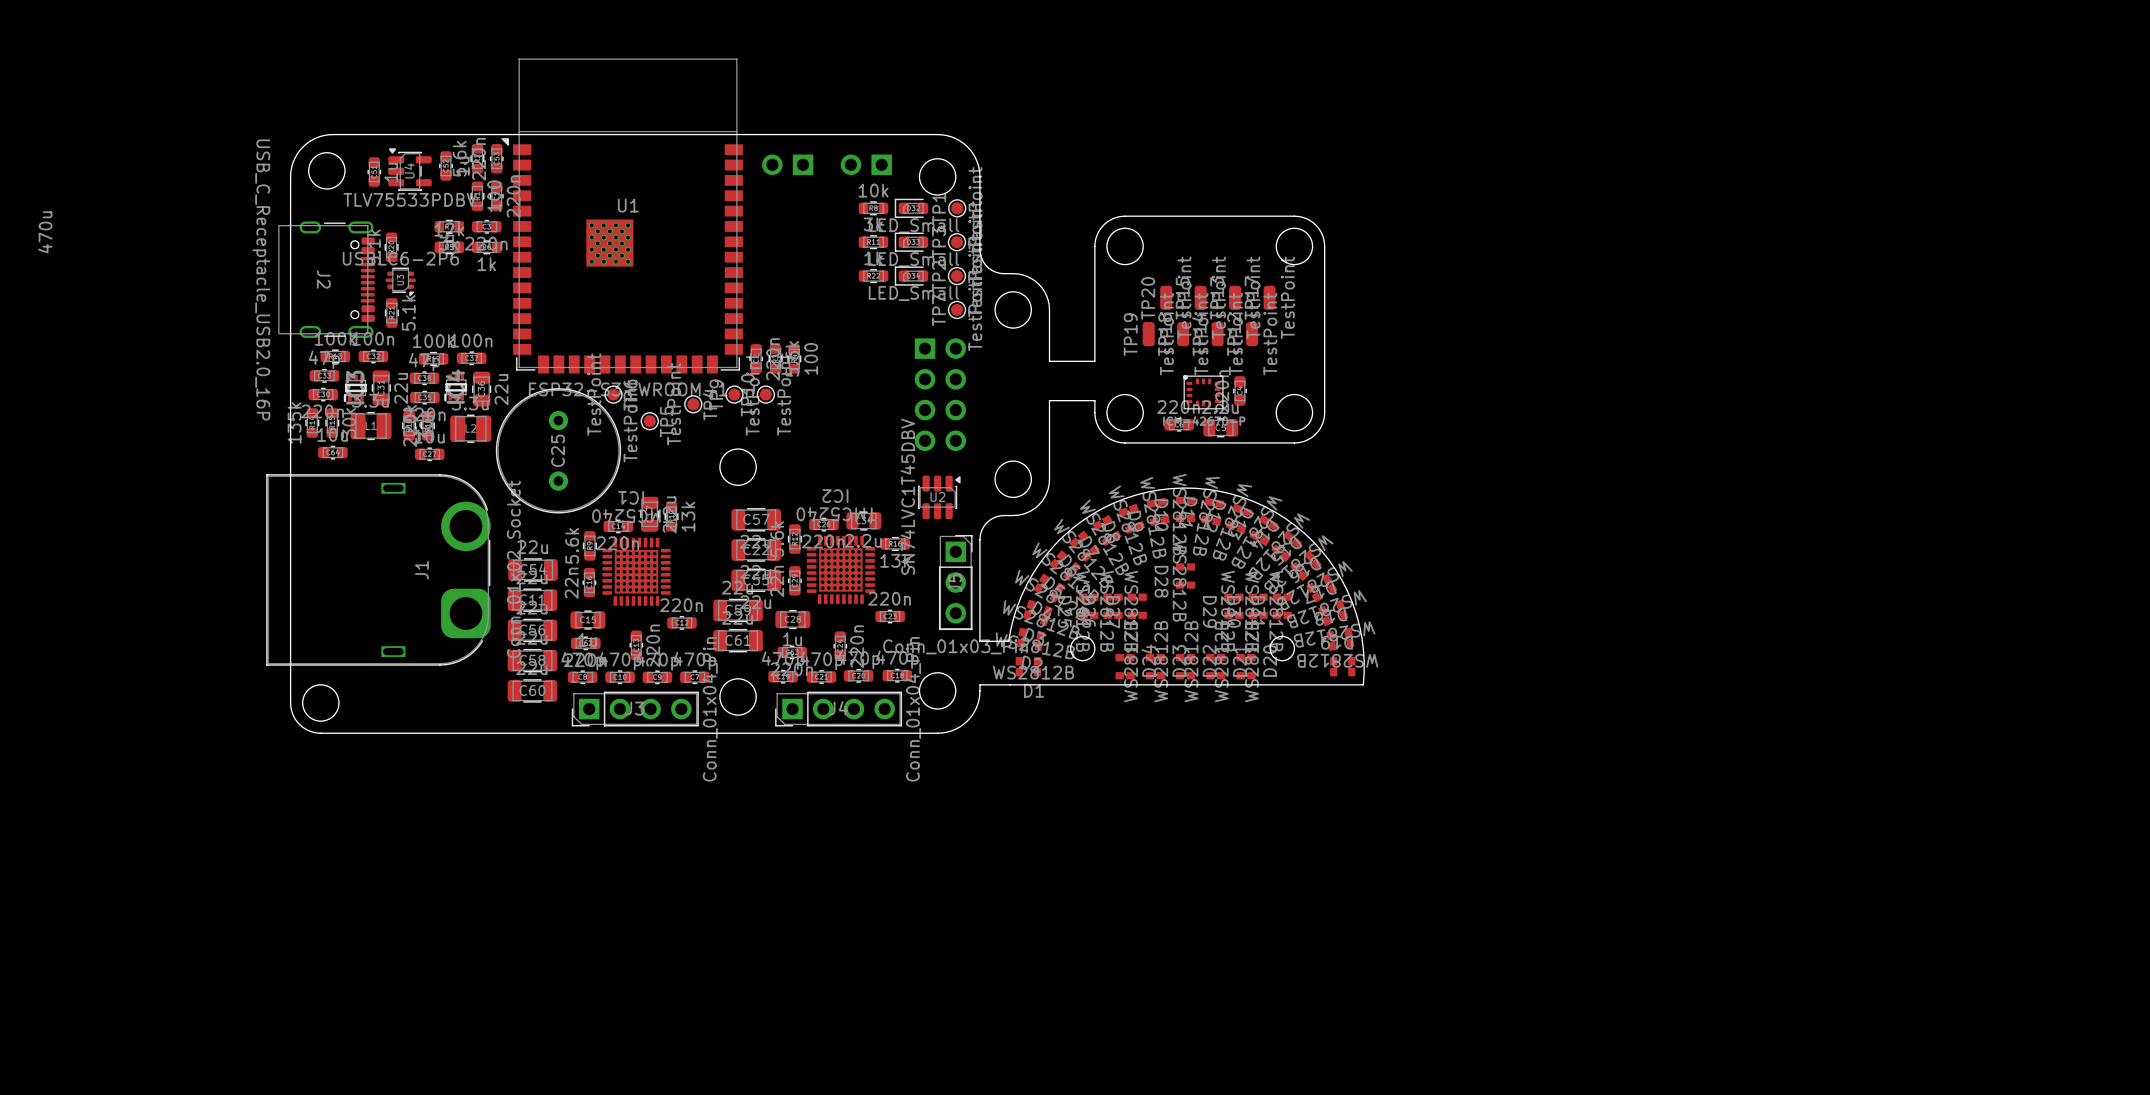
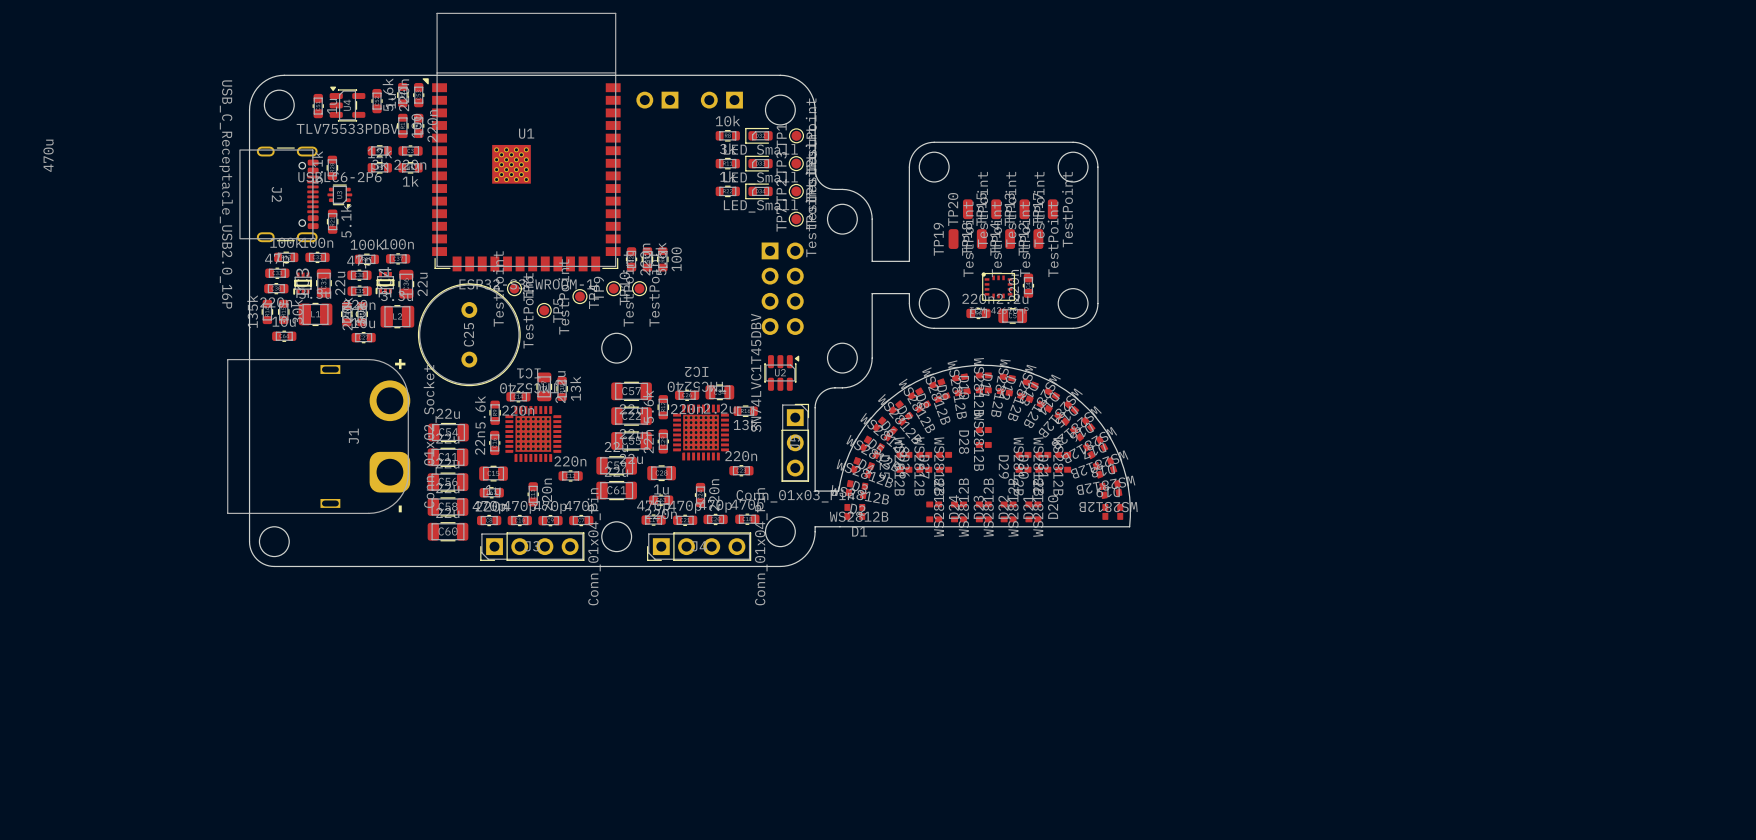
J1 footprint: [266, 474, 491, 666] -> [227, 359, 411, 514]
round board edge: [1070, 636, 1096, 661] -> none
round board edge: [1269, 636, 1295, 661] -> none

